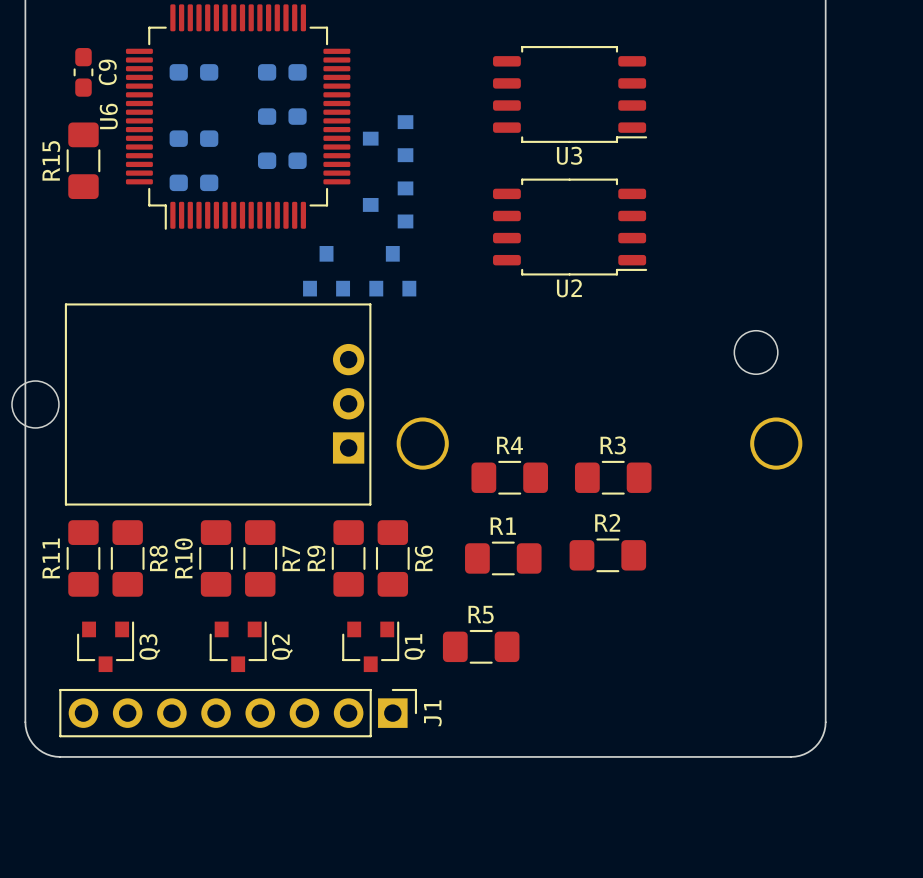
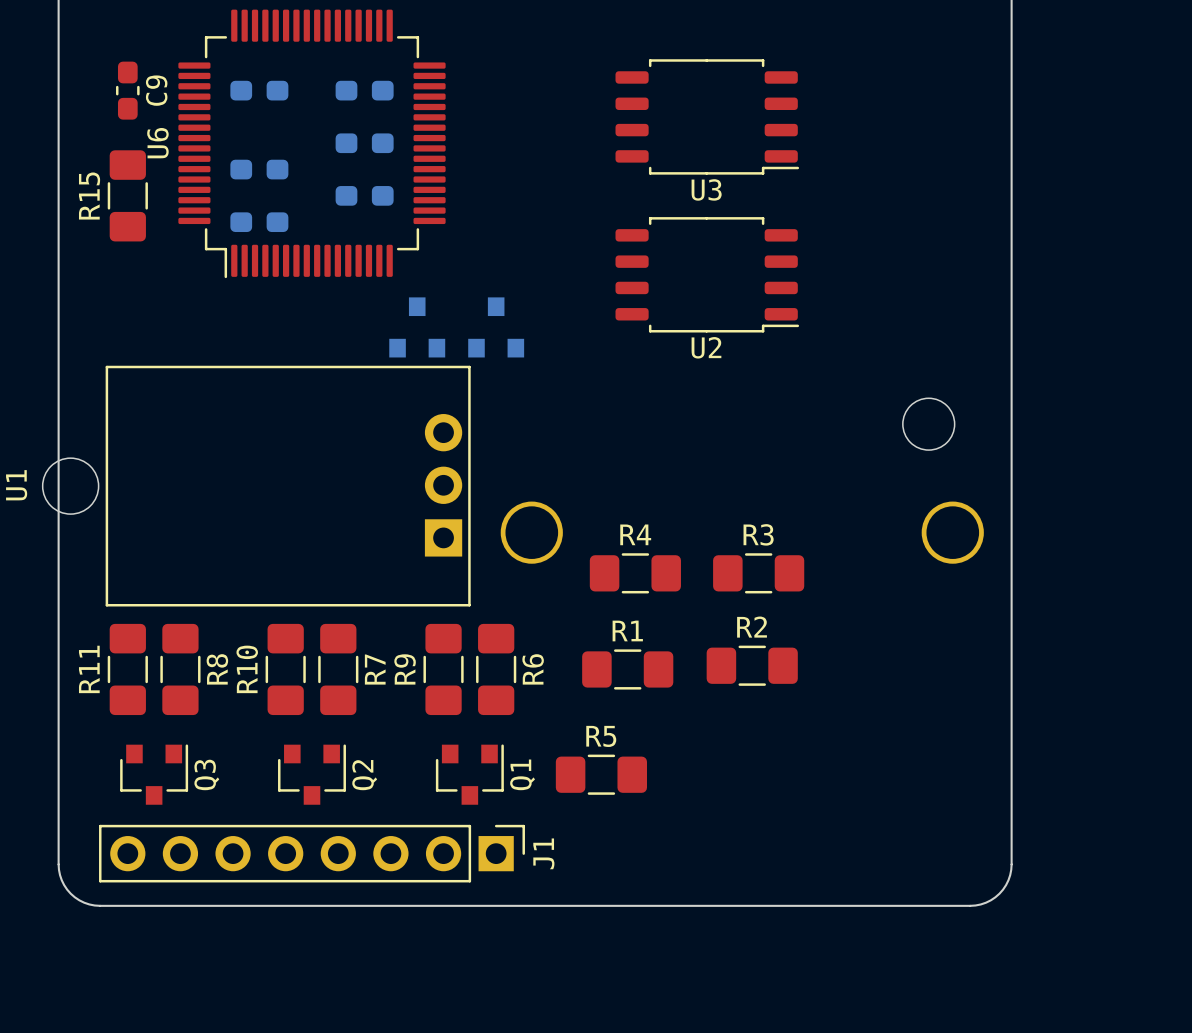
part: (388, 138) -> none
part: (388, 204) -> none

